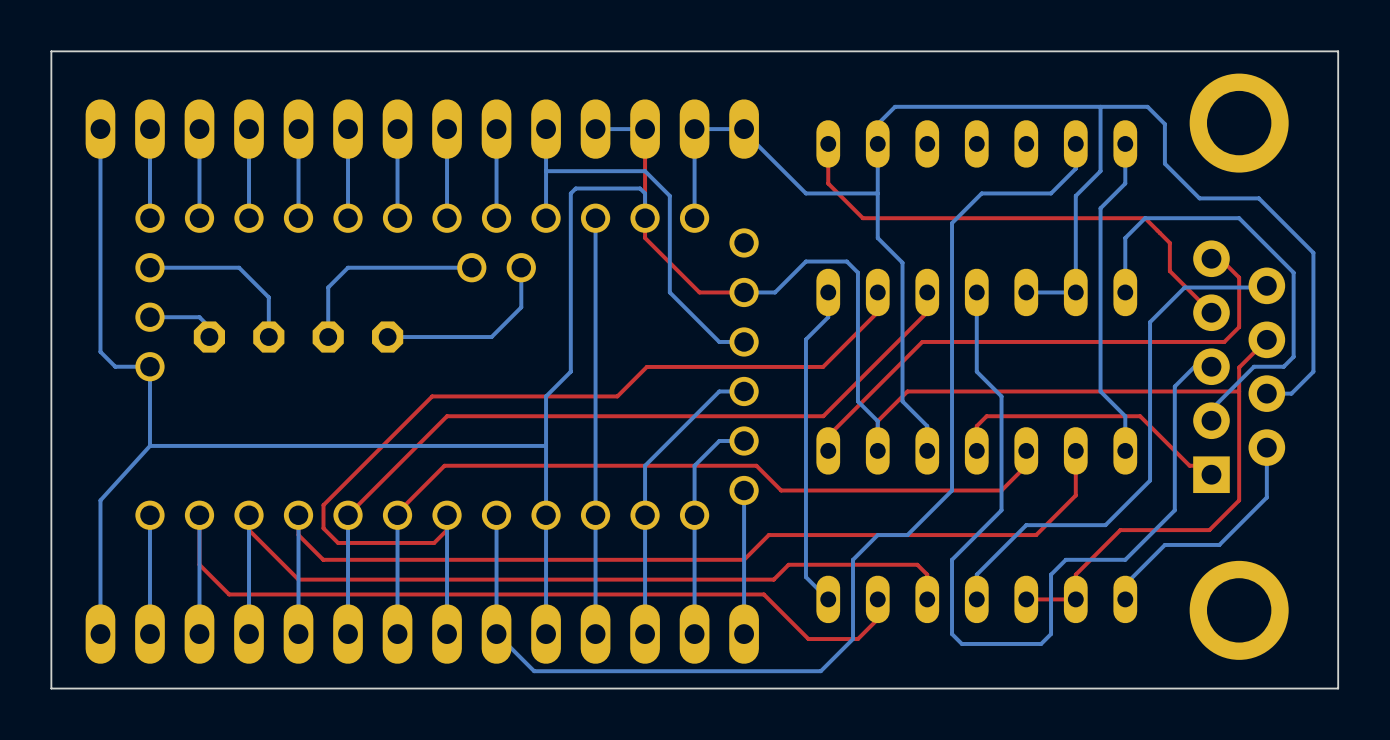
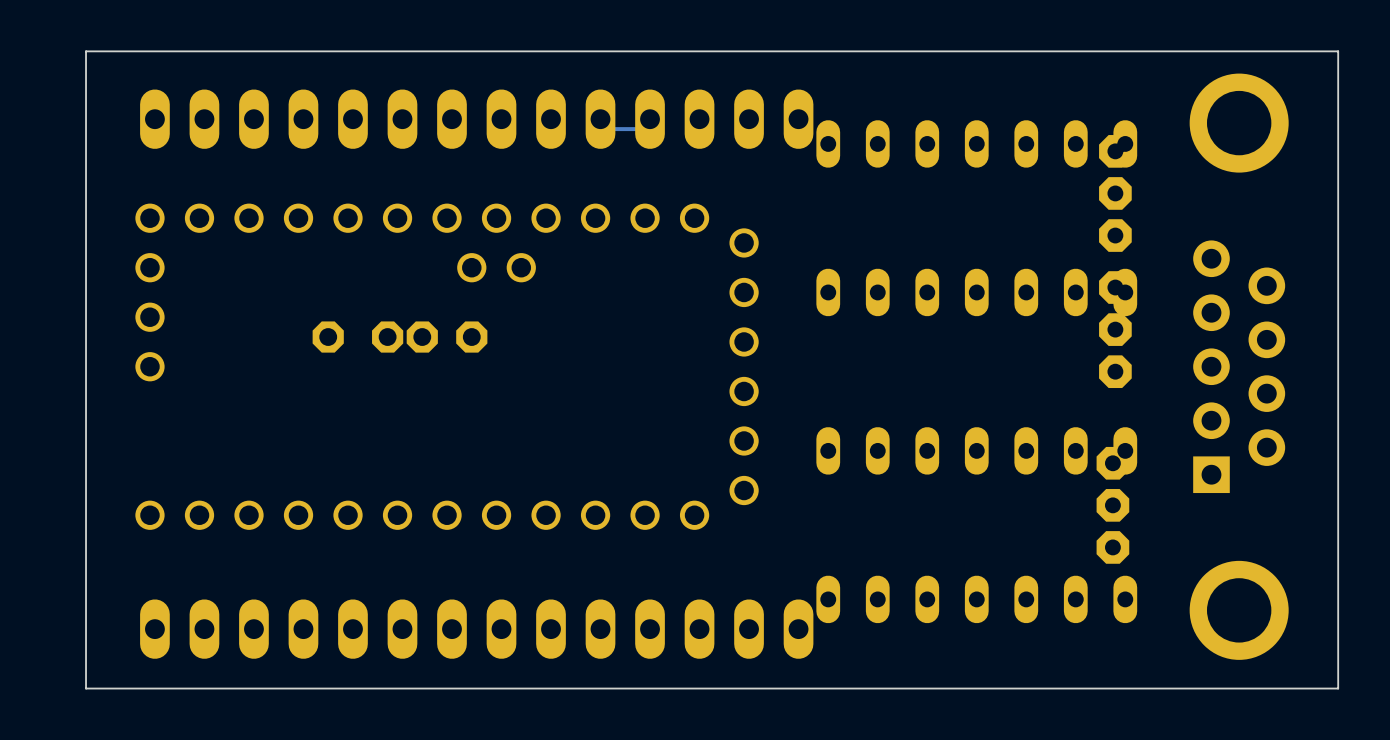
board edge: (86, 51) (51, 51) (51, 688) (86, 688) -> (86, 51) (86, 688)
bottom track: (1100, 106) (1100, 171) (1075, 195) (1075, 292) (1026, 292) -> none
bottom track: (100, 129) (100, 351) (115, 366) (149, 366) (149, 445) -> none
bottom track: (149, 129) (149, 218) -> none
bottom track: (199, 129) (199, 218) -> none
bottom track: (249, 129) (249, 218) -> none
bottom track: (298, 129) (298, 218) -> none
bottom track: (348, 129) (348, 218) -> none
bottom track: (397, 129) (397, 218) -> none
part position: (422, 129) -> (476, 119)
bottom track: (447, 129) (447, 218) -> none
bottom track: (496, 129) (496, 218) -> none
bottom track: (546, 129) (546, 218) -> none
top track: (645, 129) (645, 238) (699, 292) (744, 292) -> none
top track: (828, 143) (828, 183) (862, 218) (1145, 218) (1169, 242) (1169, 271) (1211, 312) -> none
bottom track: (1075, 143) (1075, 168) (1051, 193) (981, 193) (952, 223) (952, 490) (907, 535) (877, 535) (853, 559) (853, 639) (820, 671) (534, 671) (496, 634) (496, 515) -> none
bottom track: (1125, 143) (1125, 183) (1100, 208) (1100, 391) (1125, 416) (1125, 450) -> none
bottom track: (546, 171) (645, 171) (669, 195) (669, 292) (719, 341) (744, 341) -> none
bottom track: (877, 193) (805, 193) (744, 131) (744, 129) (694, 129) (694, 218) -> none
part: none -> (1115, 193)
bottom track: (595, 218) (595, 634) -> none
bottom track: (645, 218) (645, 193) (640, 188) (575, 188) (570, 193) (570, 371) (546, 396) (546, 634) -> none
top track: (1211, 258) (1220, 258) (1239, 277) (1239, 327) (1224, 341) (922, 341) (828, 436) (828, 450) -> none
bottom track: (149, 267) (239, 267) (268, 297) (268, 337) -> none
bottom track: (471, 267) (348, 267) (328, 287) (328, 337) -> none
bottom track: (521, 267) (521, 307) (491, 337) (387, 337) -> none
bottom track: (1266, 285) (1265, 287) (1184, 287) (1150, 322) (1150, 480) (1105, 525) (1026, 525) (976, 574) (976, 599) -> none
bottom track: (744, 292) (775, 292) (805, 261) (846, 261) (857, 272) (857, 401) (877, 421) (877, 450) -> none
bottom track: (828, 292) (828, 317) (805, 339) (805, 577) (828, 599) -> none
top track: (877, 292) (877, 312) (823, 366) (646, 366) (617, 396) (432, 396) (323, 505) (323, 528) (338, 542) (434, 542) (447, 530) (447, 515) -> none
top track: (927, 292) (927, 312) (823, 416) (447, 416) (348, 515) -> none
bottom track: (976, 292) (976, 371) (1001, 396) (1001, 510) (952, 559) (952, 634) (961, 643) (1041, 643) (1051, 634) (1051, 574) (1065, 559) (1125, 559) (1174, 510) (1174, 386) (1194, 366) (1211, 366) -> none
bottom track: (1125, 292) (1125, 238) (1145, 218) (1239, 218) (1293, 272) (1293, 356) (1283, 366) (1254, 366) (1211, 409) (1211, 420) -> none
bottom track: (149, 317) (199, 317) (209, 327) (209, 337) -> none
part: none -> (1115, 329)
part: (209, 337) -> none
part: (268, 337) -> none
part: none -> (422, 337)
part: none -> (471, 337)
top track: (1266, 339) (1239, 367) (1239, 500) (1209, 530) (1120, 530) (1075, 574) (1075, 599) (1026, 599) -> none
bottom track: (744, 391) (719, 391) (645, 465) (645, 634) -> none
top track: (1239, 391) (907, 391) (877, 421) (877, 450) -> none
bottom track: (1266, 393) (1291, 393) (1313, 371) (1313, 252) (1258, 198) (1199, 198) (1164, 163) (1164, 124) (1147, 106) (895, 106) (877, 124) (877, 238) (902, 262) (902, 401) (927, 426) (927, 450) -> none
bottom track: (744, 440) (719, 440) (694, 465) (694, 634) -> none
bottom track: (149, 445) (100, 500) (100, 634) -> none
bottom track: (546, 445) (149, 445) -> none
bottom track: (1266, 447) (1266, 497) (1219, 544) (1164, 544) (1125, 584) (1125, 599) -> none
top track: (976, 450) (976, 426) (986, 416) (1140, 416) (1189, 465) (1202, 465) (1211, 474) -> none
top track: (1026, 450) (1026, 465) (1001, 490) (781, 490) (756, 465) (444, 465) (397, 512) (397, 515) -> none
top track: (1075, 450) (1075, 495) (1036, 535) (768, 535) (744, 559) (323, 559) (298, 535) (298, 515) -> none
bottom track: (744, 490) (744, 634) -> none
part: none -> (1112, 505)
bottom track: (149, 515) (149, 634) -> none
bottom track: (199, 515) (199, 634) -> none
top track: (199, 515) (199, 564) (229, 594) (763, 594) (808, 639) (857, 639) (877, 619) (877, 599) -> none
bottom track: (249, 515) (249, 634) -> none
top track: (249, 515) (249, 530) (298, 579) (773, 579) (788, 564) (917, 564) (927, 574) (927, 599) -> none
bottom track: (298, 515) (298, 634) -> none
bottom track: (348, 515) (348, 634) -> none
bottom track: (397, 515) (397, 634) -> none
bottom track: (447, 515) (447, 634) -> none
part position: (422, 634) -> (476, 629)

